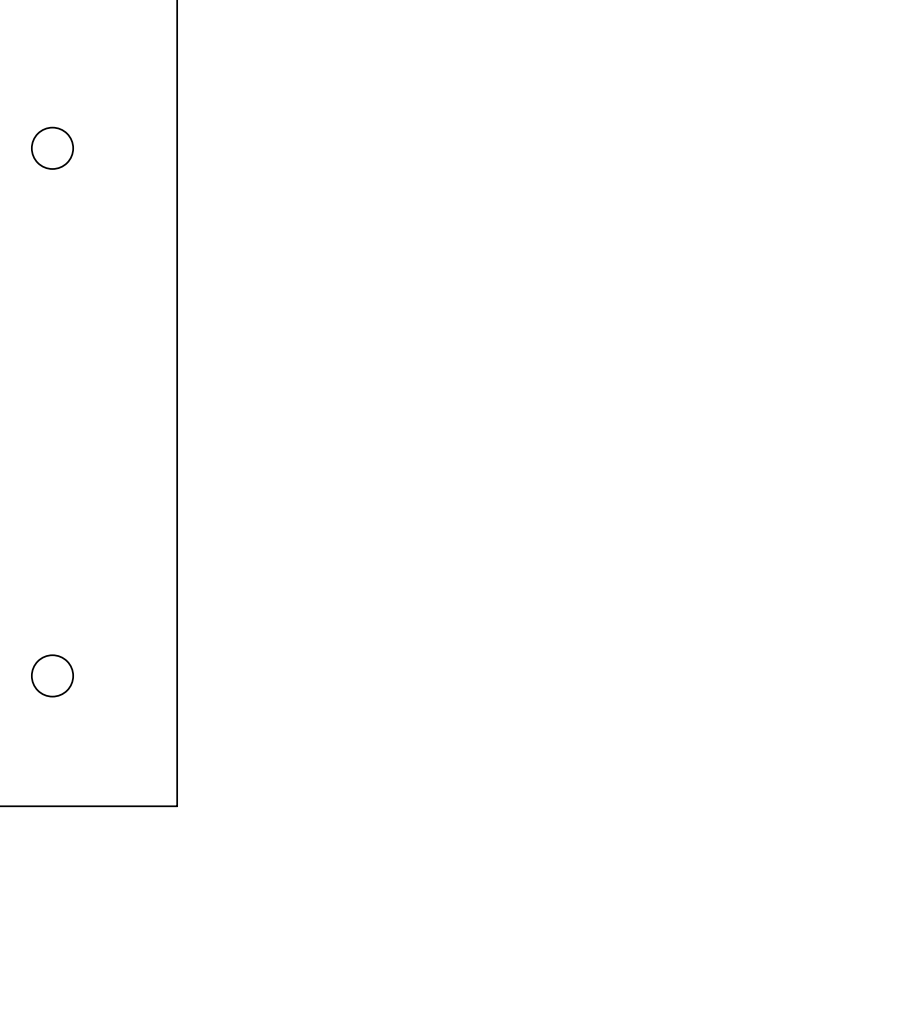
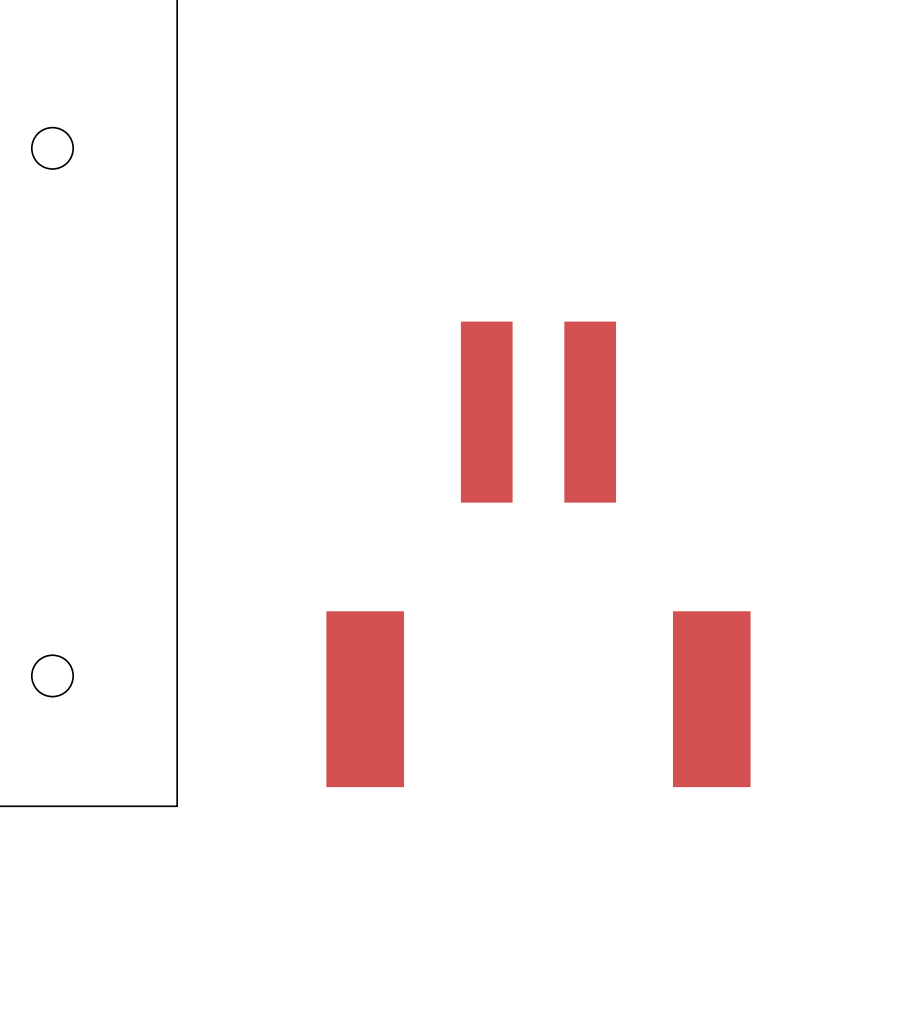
part: none -> (538, 554)

